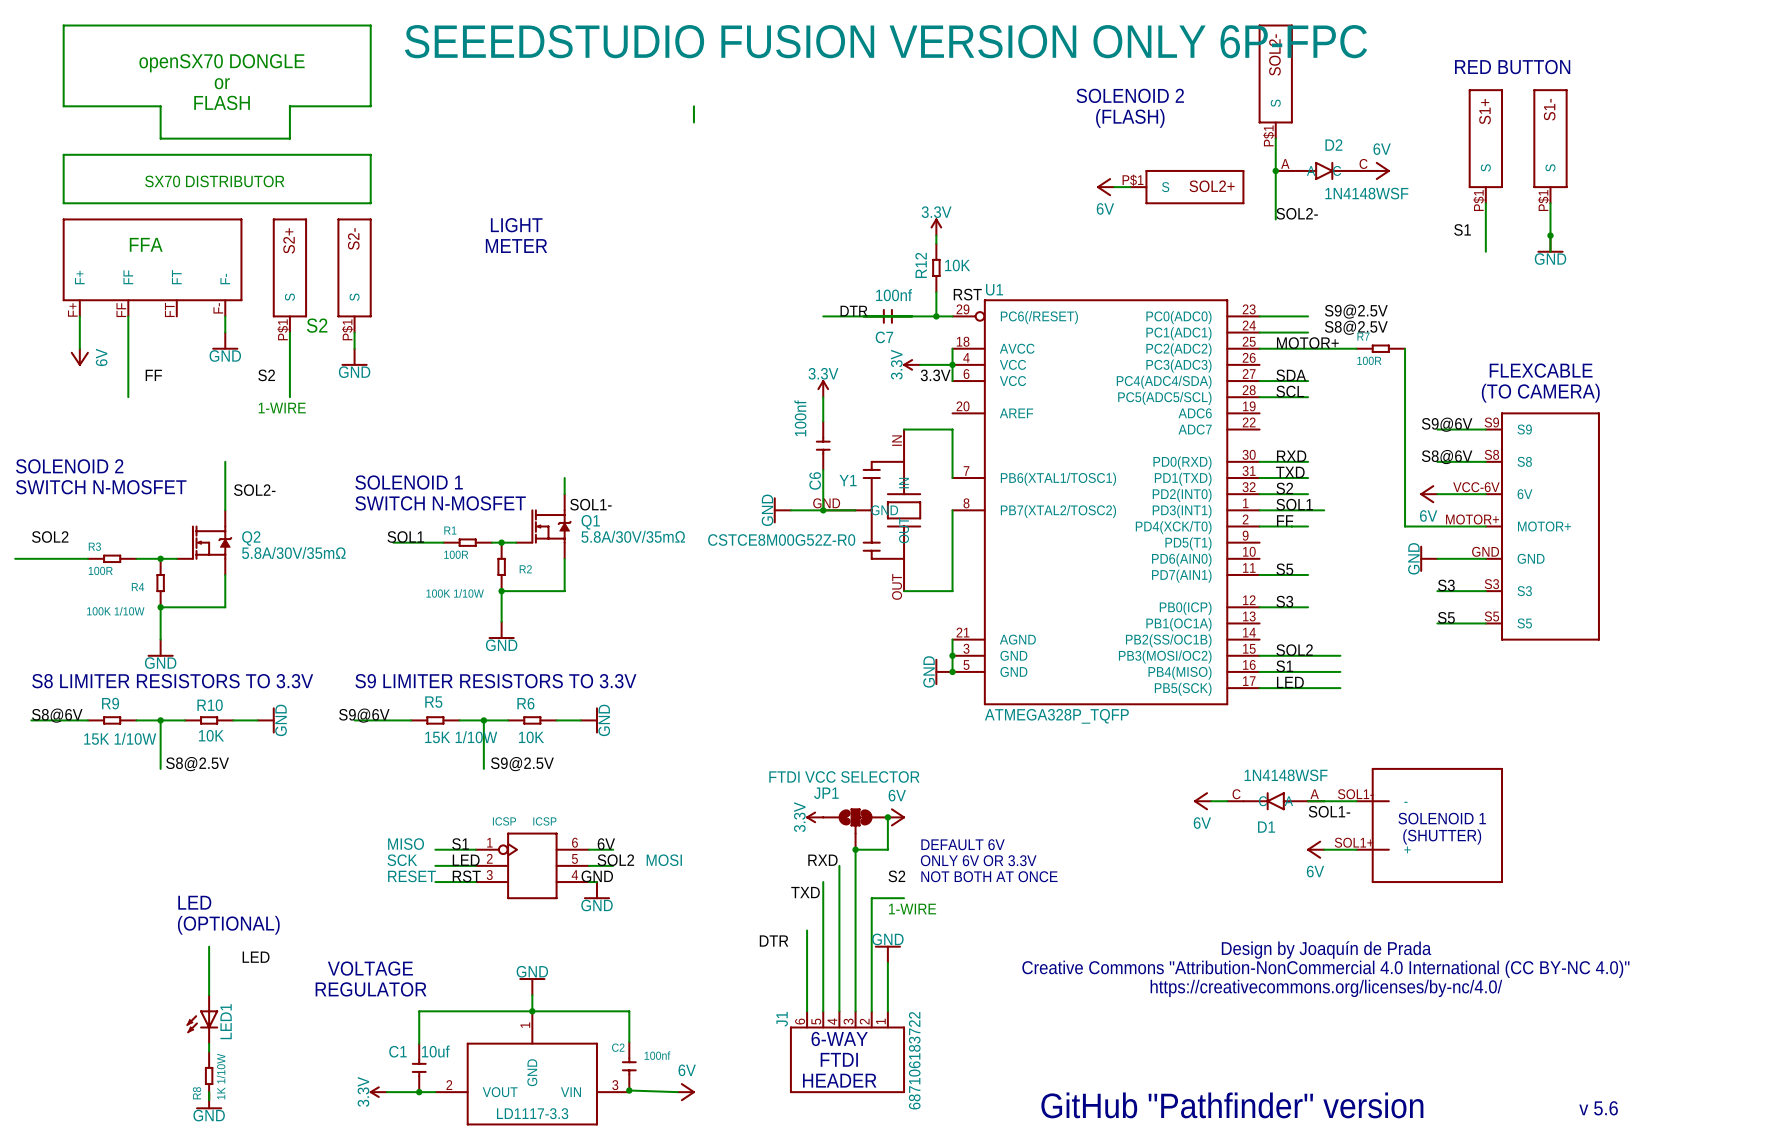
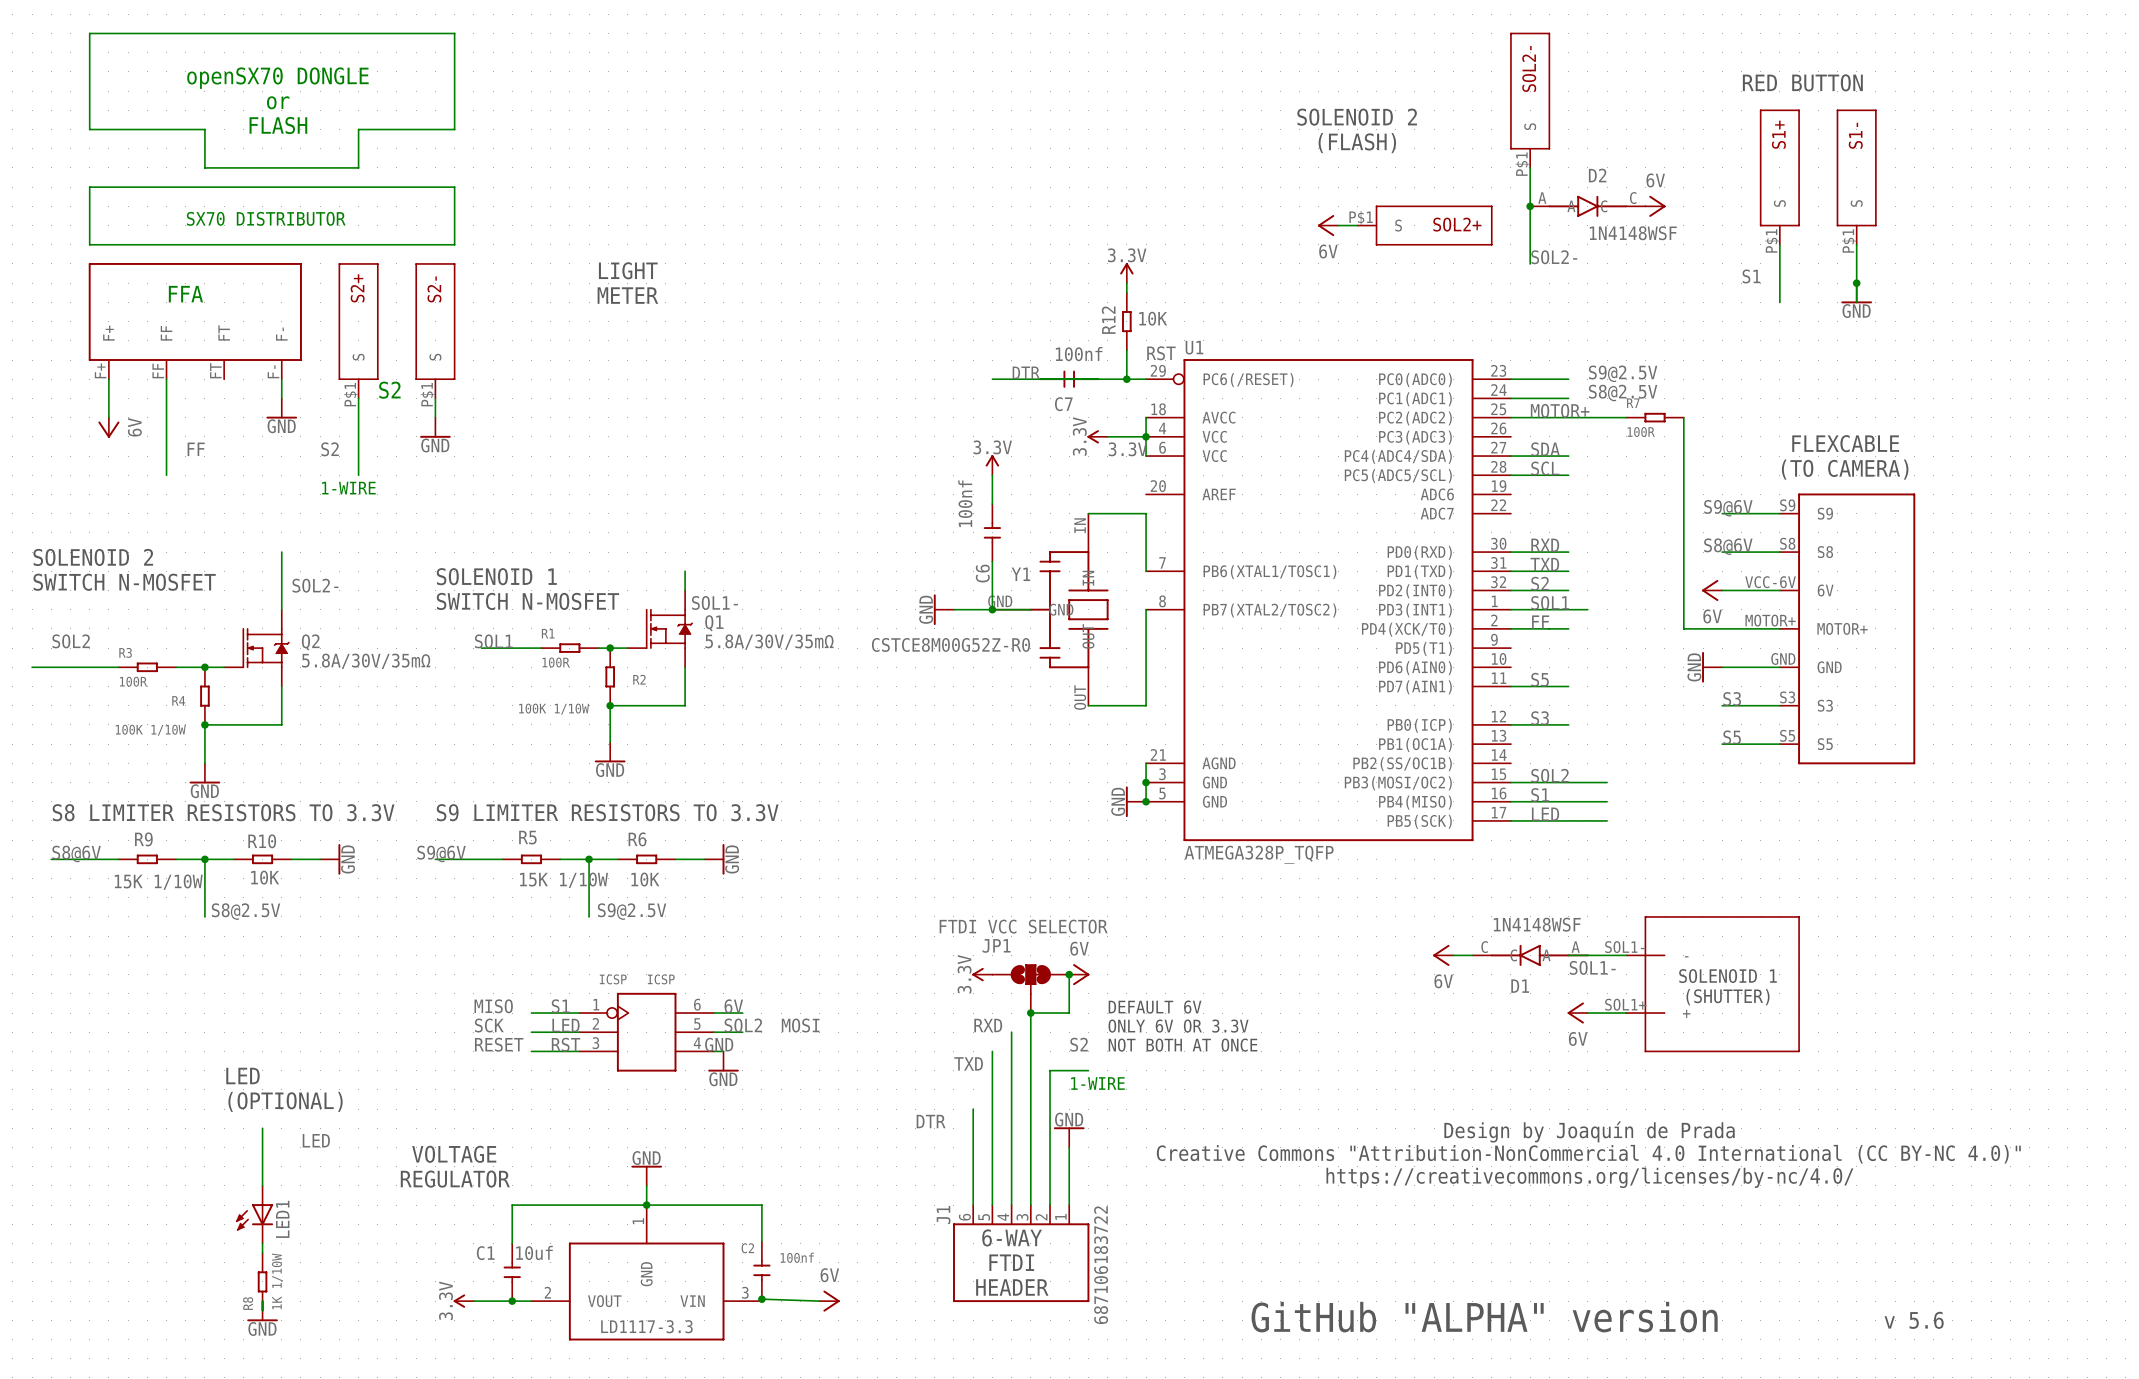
text: SEEEDSTUDIO FUSION VERSION ONLY 6P-FPC (886, 41) -> none
wire: (693, 106) (693, 122) -> none
text: GitHub "Pathfinder" version (1232, 1105) -> GitHub "ALPHA" version (1484, 1317)

